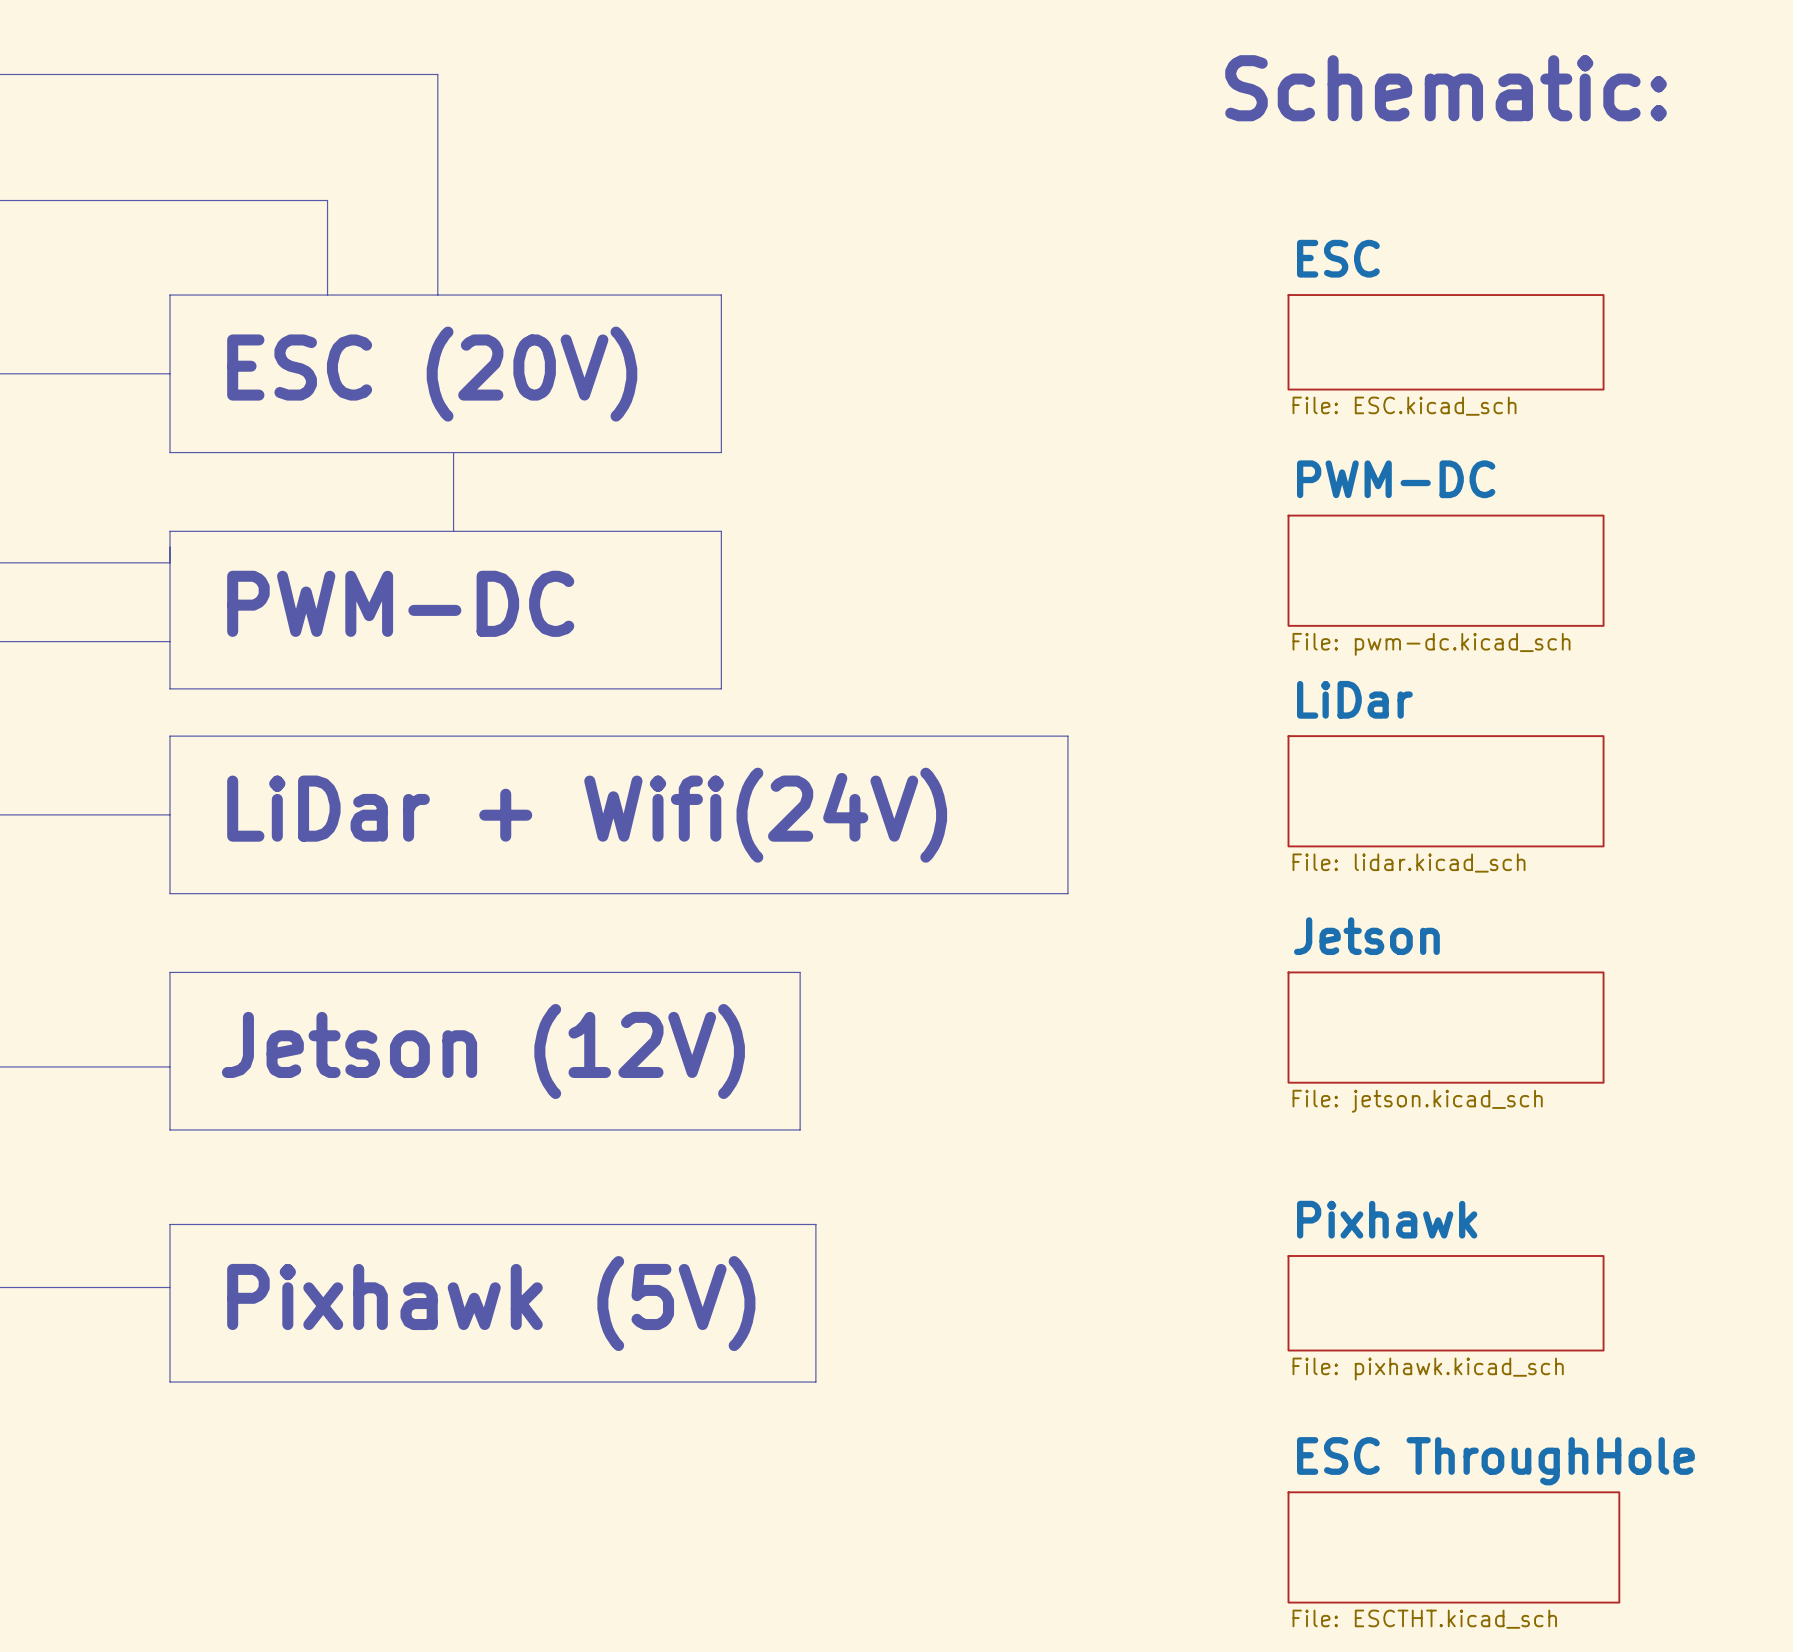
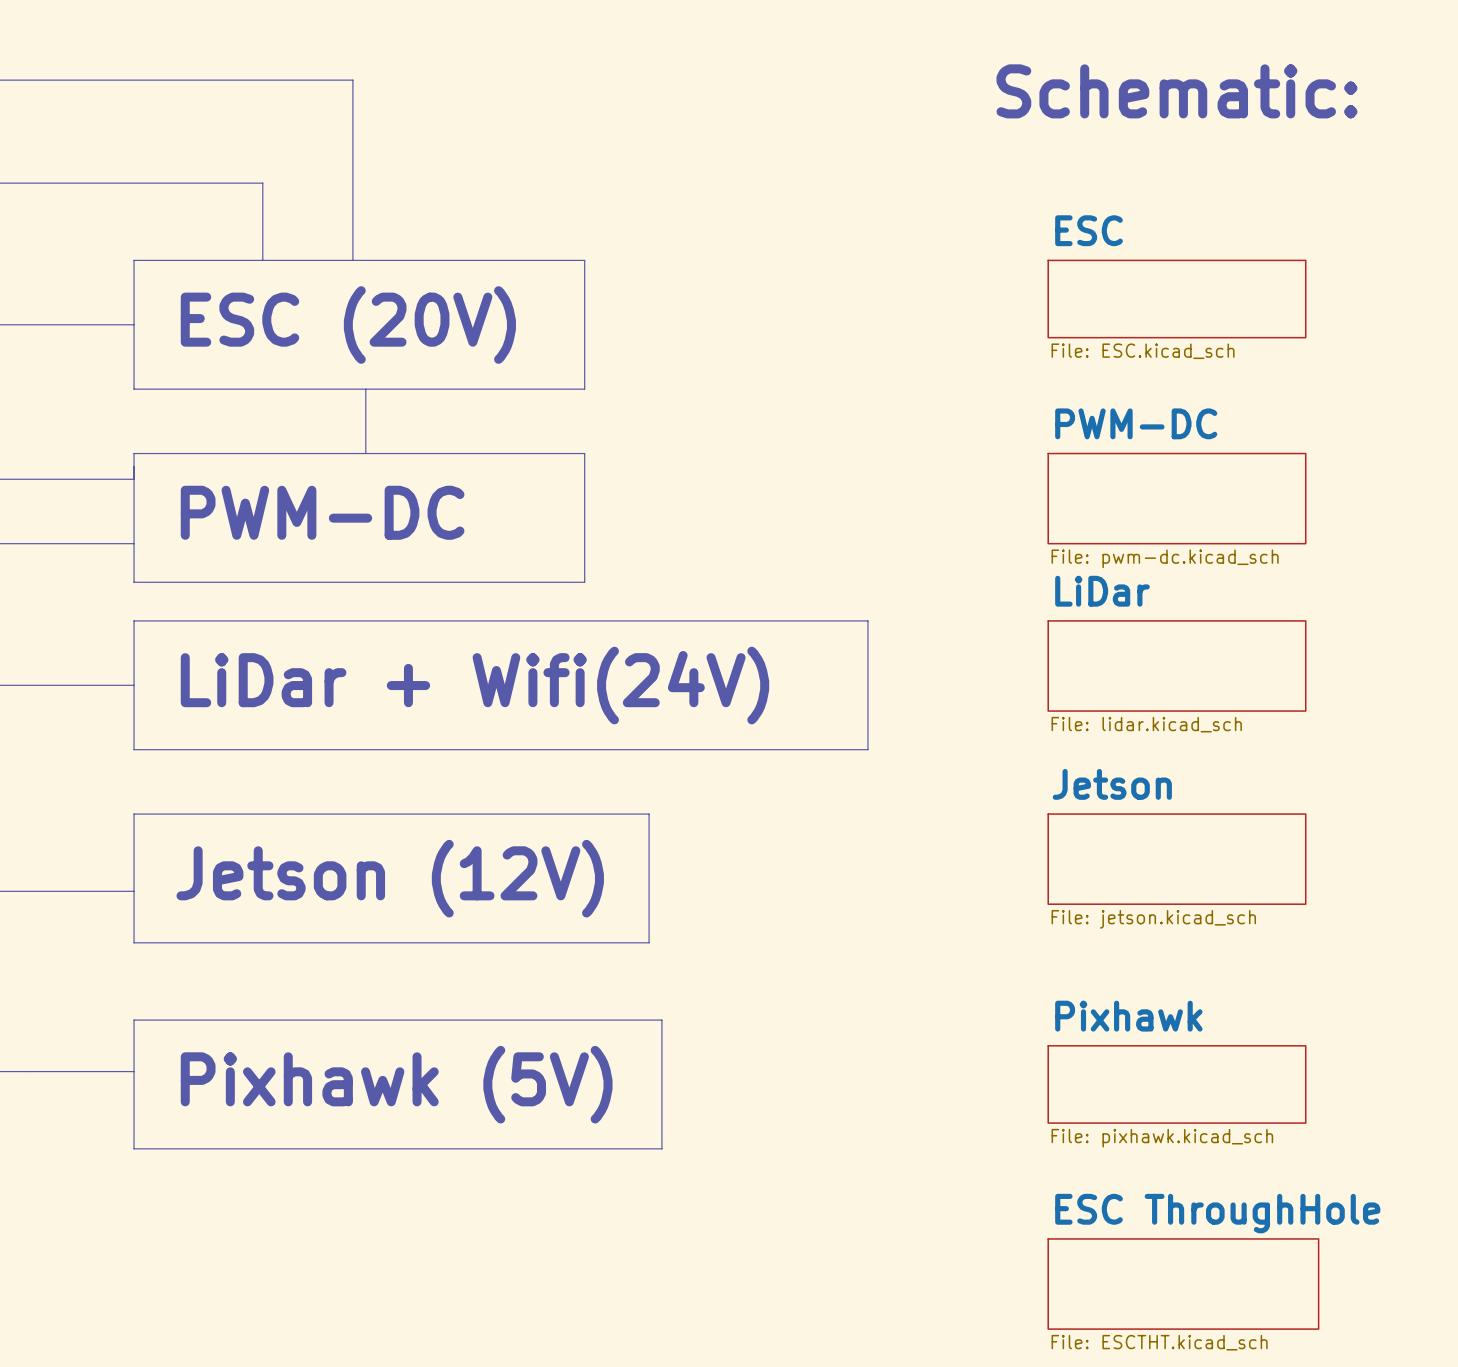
sheet PWM-DC position: (1446, 570) -> (1176, 498)

